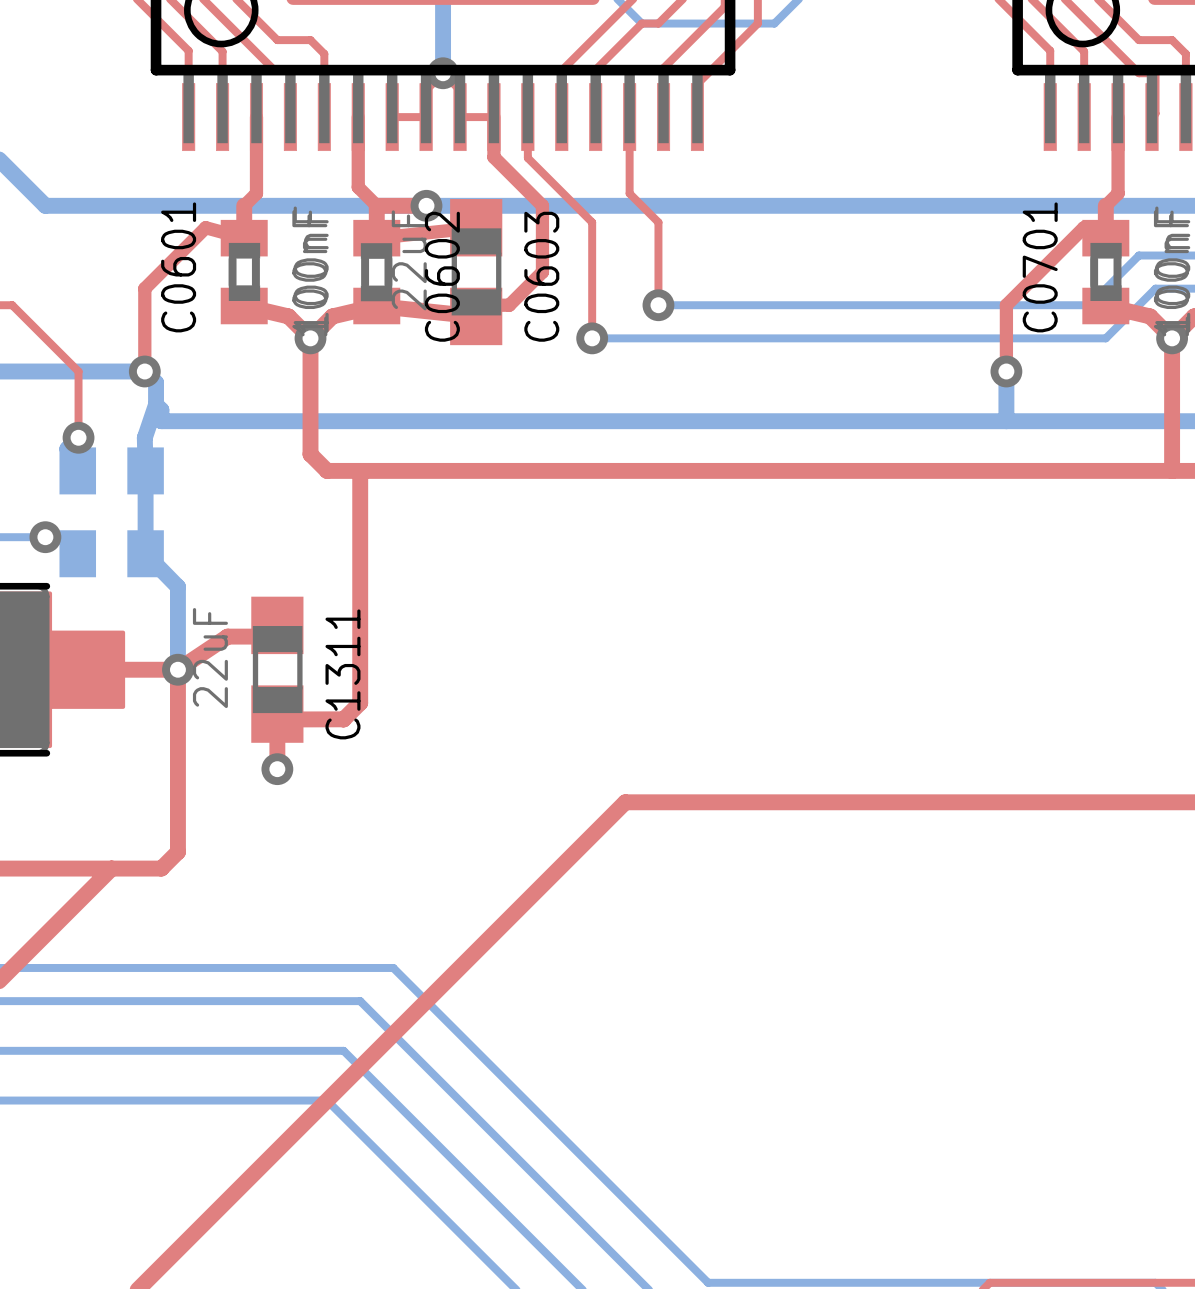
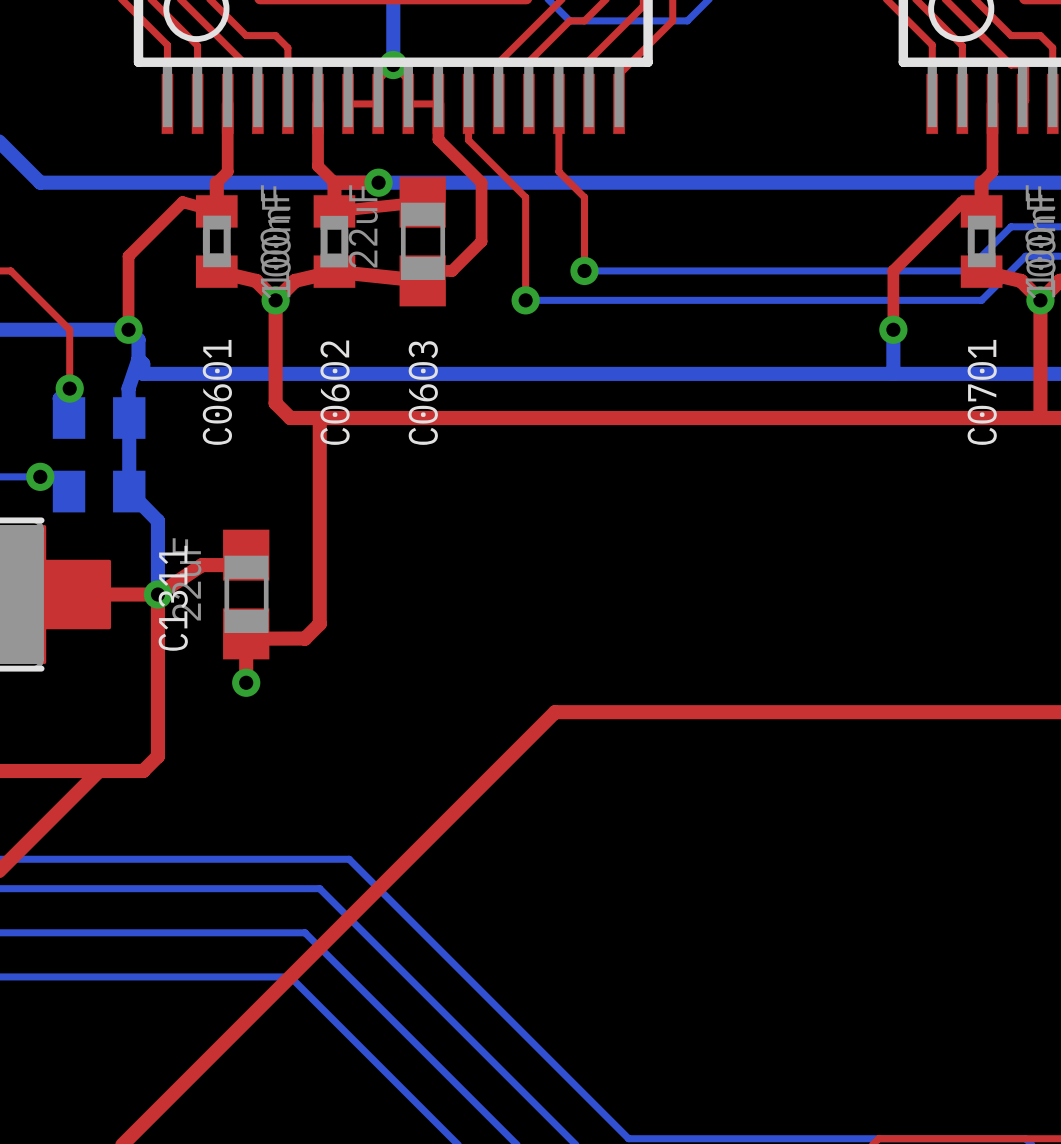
C0601 name position: C0601 (178, 267) -> C0601 (217, 392)
C0701 name position: C0701 (1040, 267) -> C0701 (982, 392)
C0602 name position: C0602 (442, 276) -> C0602 (335, 392)
C0603 name position: C0603 (541, 276) -> C0603 (423, 393)
C1311 name position: C1311 (342, 674) -> C1311 (173, 598)

